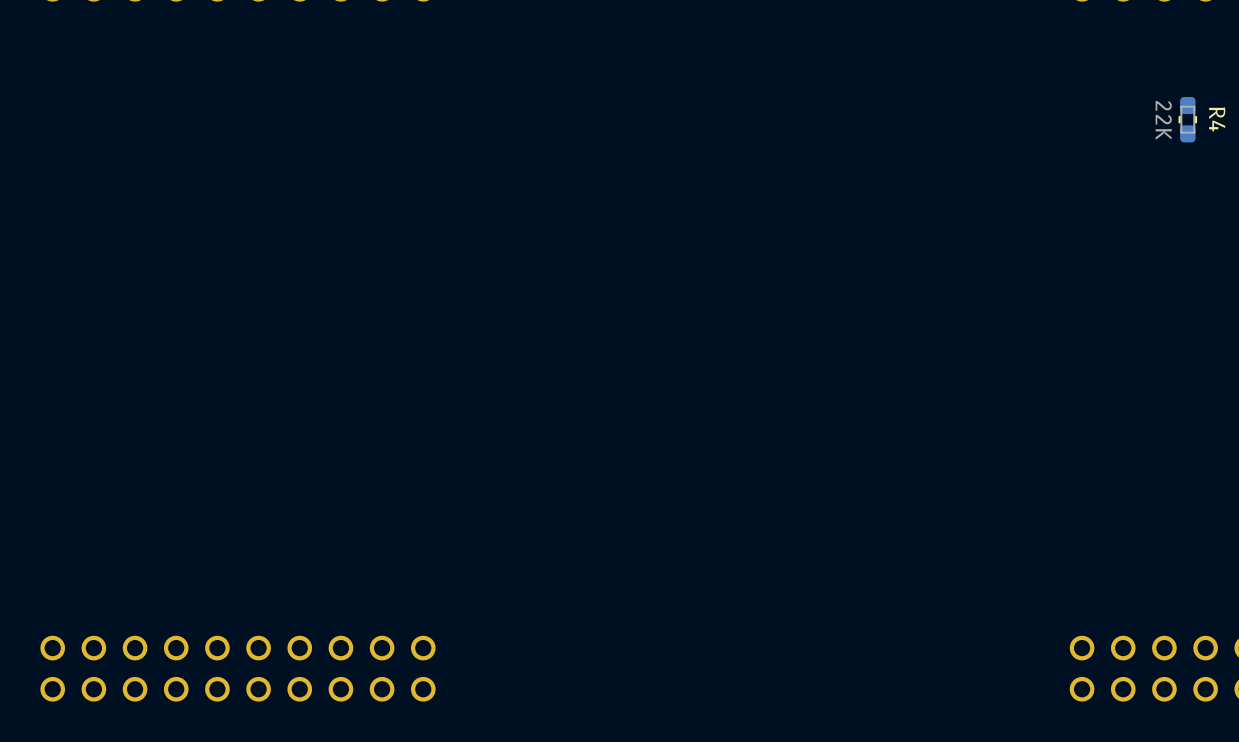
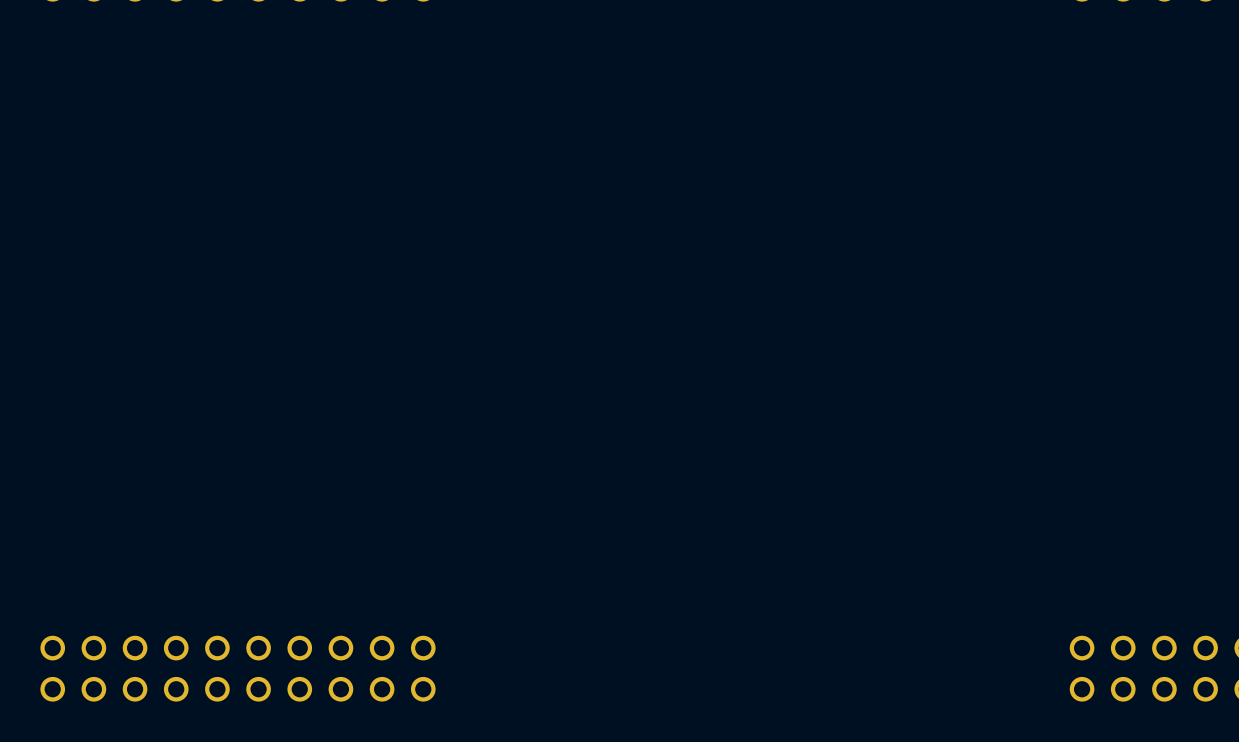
R4: 22K (1187, 119) -> none

